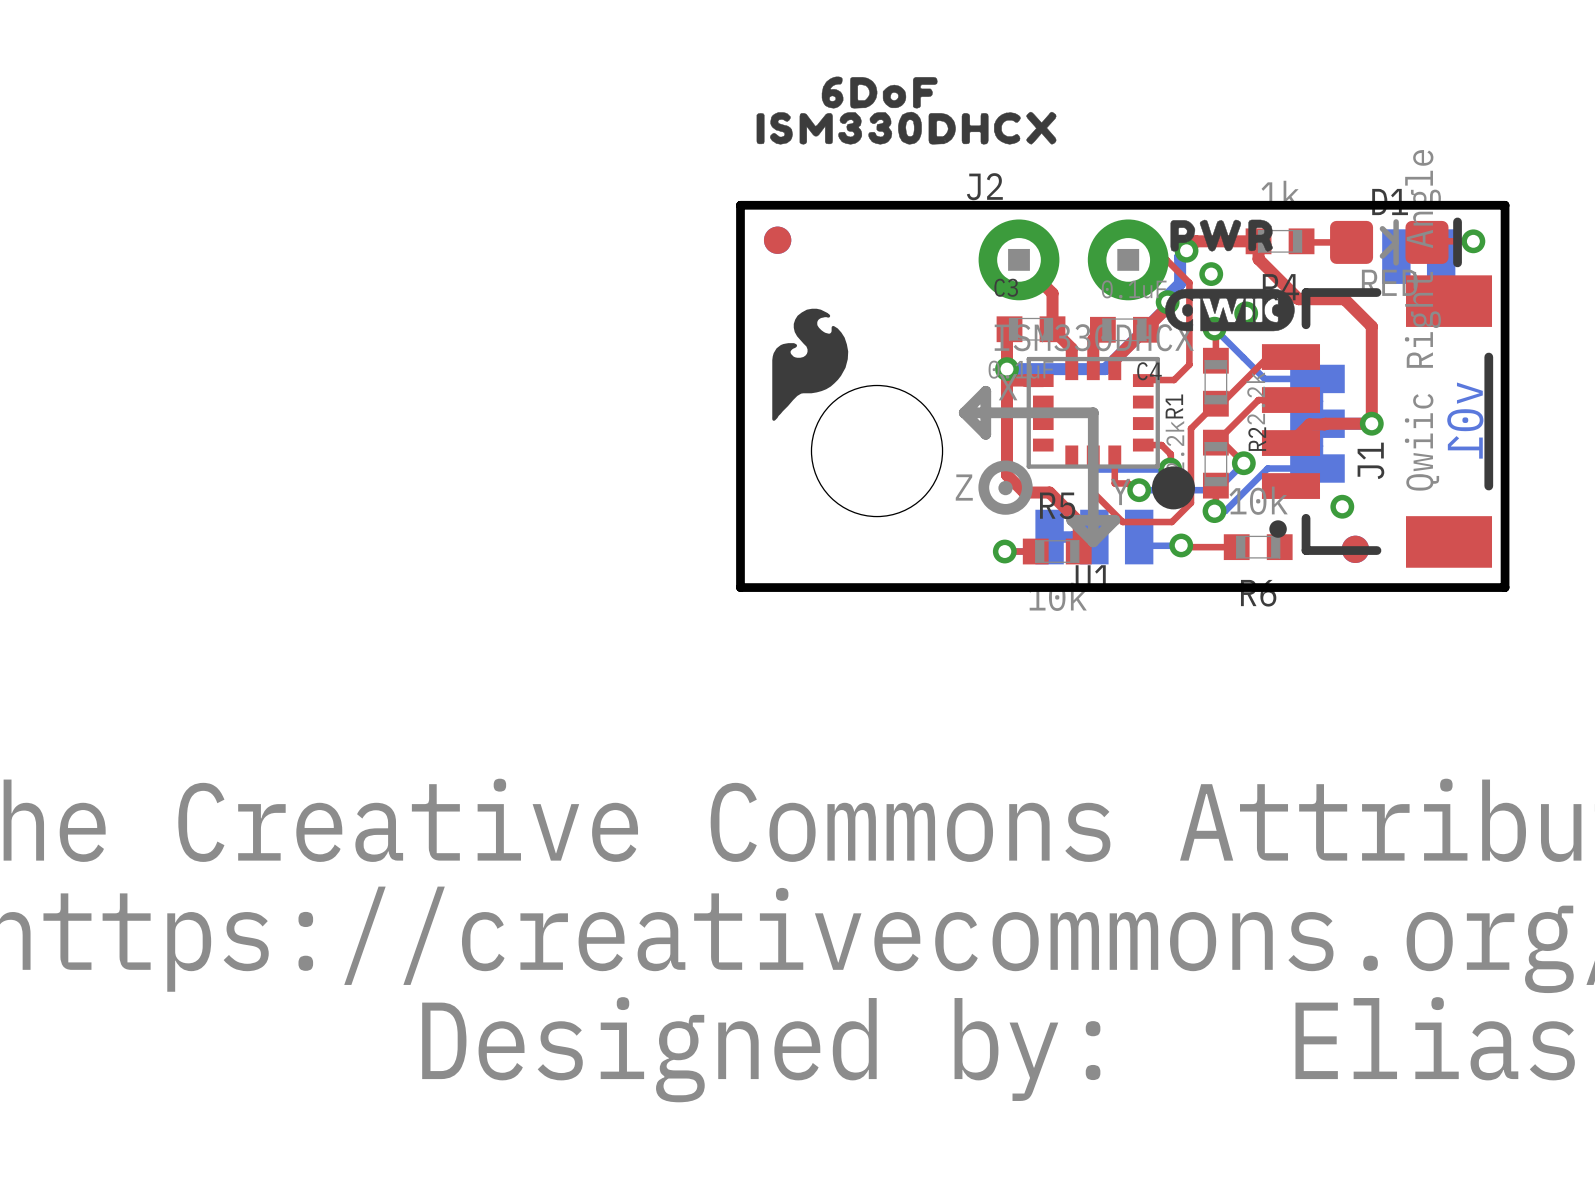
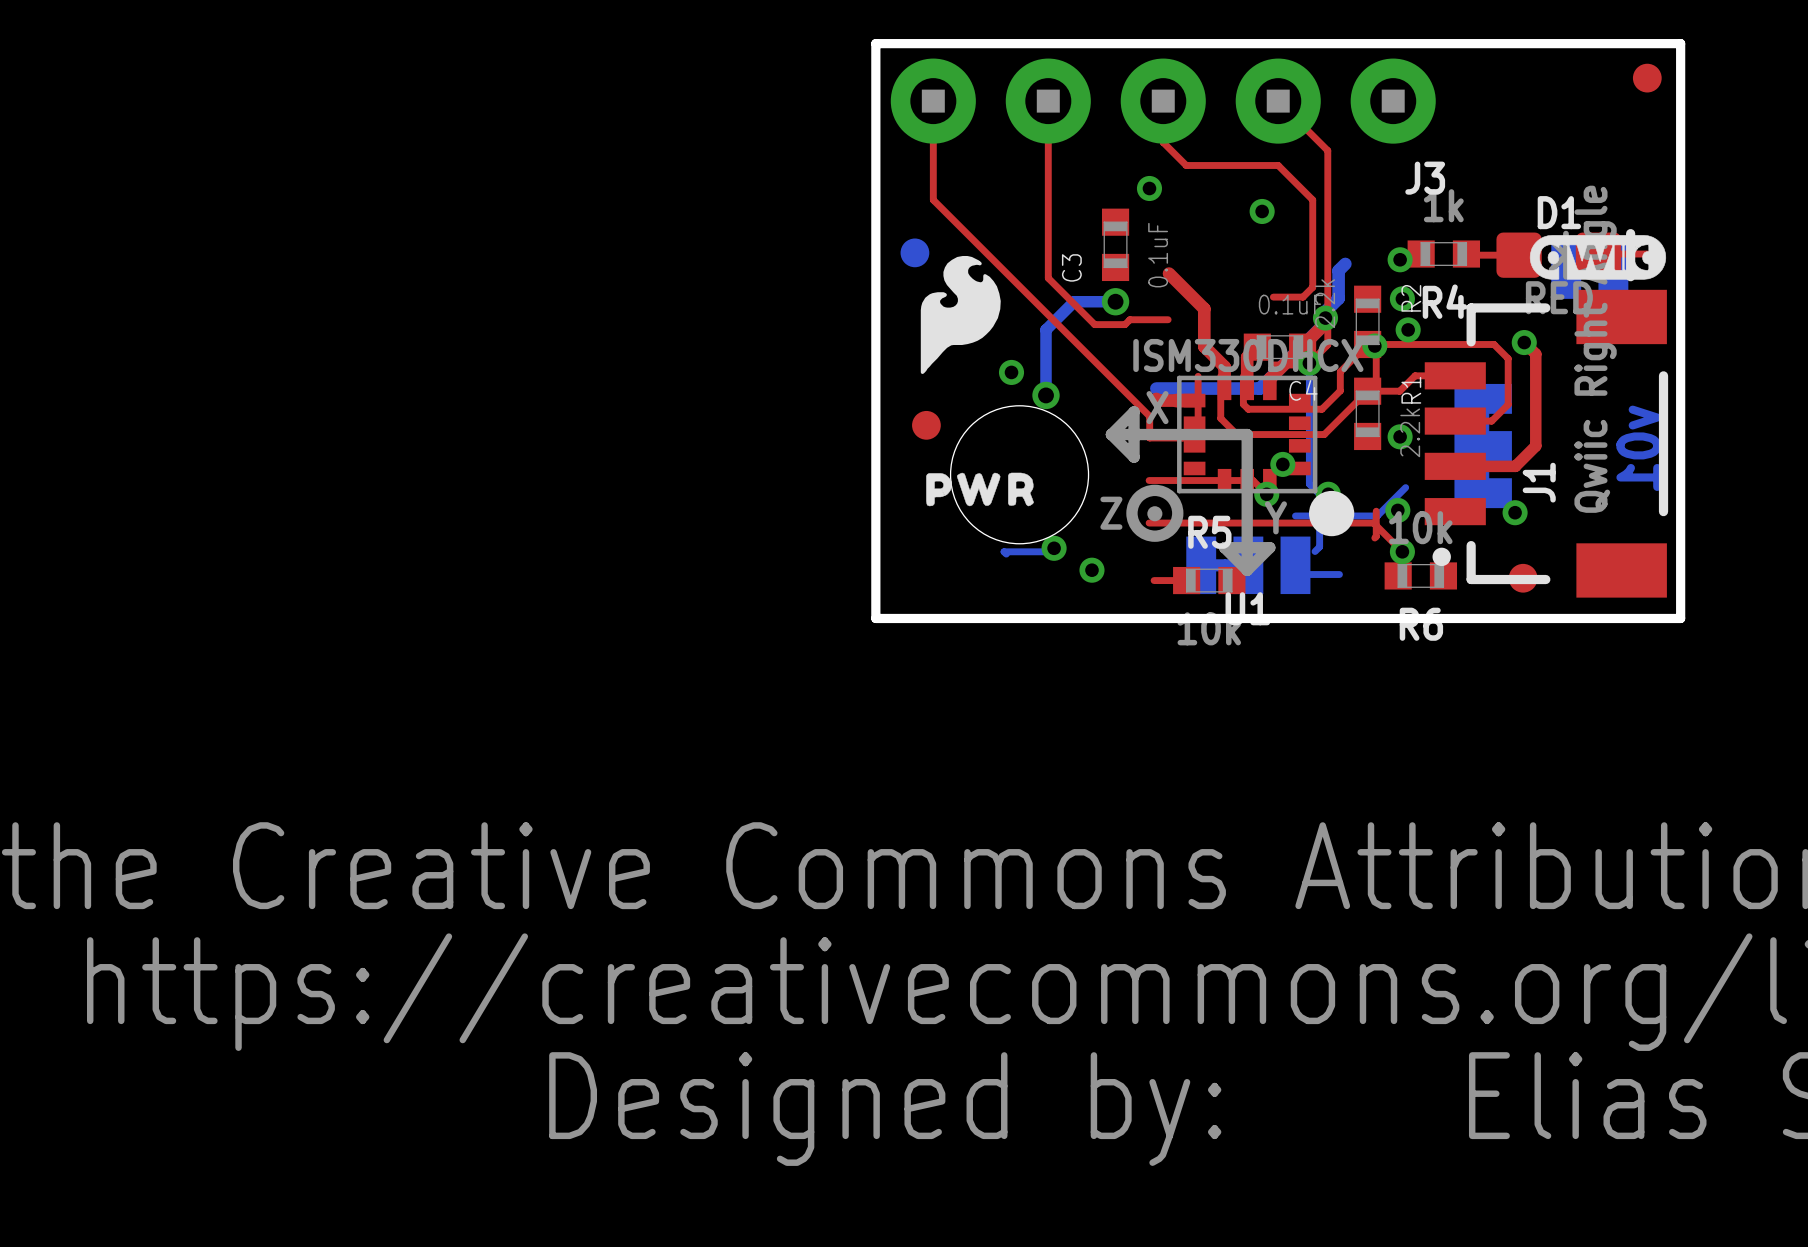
part: none -> (1647, 78)
drawing: [756, 76, 1057, 145] -> none
top track: none -> (933, 101) (933, 199) (1149, 416) (1149, 437) (1182, 437) (1198, 422) (1198, 376)
top track: none -> (1048, 101) (1048, 278) (1094, 324) (1125, 324) (1129, 319) (1168, 319)
top track: none -> (1163, 101) (1163, 142) (1186, 165) (1278, 165) (1312, 199) (1312, 287) (1302, 297) (1273, 297)
J3: none -> (1163, 101)
top track: none -> (1278, 101) (1327, 150) (1327, 344) (1307, 365) (1273, 365)
via: none -> (1149, 188)
via: none -> (1262, 211)
board edge: (740, 205) (1505, 205) -> (875, 216) (875, 43) (1680, 43) (1680, 216)
drawing position: (1221, 235) -> (980, 489)
part position: (777, 240) -> (926, 425)
via: (1473, 241) -> none
via: none -> (1400, 259)
via: (1186, 250) -> none
top track: (1182, 254) (1195, 241) (1258, 241) (1258, 259) (1298, 299) (1344, 299) (1371, 326) (1371, 423) (1309, 424) (1290, 443) -> (1524, 342) (1535, 354) (1535, 446) (1515, 466) (1455, 466)
J2: (1073, 259) -> none
top track: (1128, 259) (1166, 259) (1189, 282) (1189, 364) (1174, 380) (1143, 380) -> none
via: (1211, 274) -> none
via: none -> (1402, 298)
bottom track: none -> (1115, 301) (1074, 301) (1046, 329) (1046, 395)
via: none -> (1115, 301)
drawing position: (1229, 310) -> (1597, 257)
via: none -> (1524, 342)
bottom track: (1214, 328) (1264, 378) (1317, 378) -> none
top track: (1009, 329) (1006, 331) (1006, 475) (1024, 492) (1049, 492) (1078, 521) (1078, 551) -> none
C3 rotation: 0° (1031, 329) -> 90° clockwise (1115, 244)
C3 position: (1031, 329) -> (1115, 244)
bottom track: none -> (1309, 363) (1309, 484) (1319, 494) (1319, 546) (1315, 551)
via: none -> (1309, 363)
via: none -> (1011, 372)
top track: (1268, 357) (1221, 403) (1215, 403) (1190, 428) (1190, 502) (1171, 522) (1122, 522) (1093, 492) (1093, 455) -> (1431, 375) (1415, 375) (1399, 391) (1367, 391) (1324, 434) (1236, 434) (1220, 418) (1220, 376)
drawing position: (810, 364) -> (960, 314)
via: (1006, 369) -> none
via: none -> (1046, 395)
R1 position: (1215, 382) -> (1367, 413)
top track: (1290, 400) (1258, 400) (1215, 442) (1223, 442) (1243, 463) -> (1455, 421) (1491, 421) (1508, 404) (1508, 358) (1494, 344) (1367, 344) (1340, 371) (1340, 390) (1321, 409) (1248, 409) (1243, 404) (1243, 376)
R1 name position: R1 (1174, 406) -> R1 (1411, 390)
via: none -> (1400, 436)
via: (1371, 423) -> none
via: none -> (1282, 464)
top track: (1143, 445) (1161, 445) (1170, 454) (1170, 469) -> none
top track: (1114, 455) (1114, 483) (1128, 483) (1134, 490) (1139, 490) -> none
top track: none -> (1149, 480) (1252, 480) (1266, 494)
via position: (1243, 463) -> (1397, 510)
R2 position: (1215, 464) -> (1367, 321)
bottom track: (1317, 468) (1267, 468) (1225, 511) (1214, 511) -> none
bottom track: (1094, 469) (1170, 469) -> none
via: none -> (1266, 494)
via: (1139, 490) -> none
top track: none -> (1149, 523) (1373, 523) (1402, 551)
via position: (1342, 506) -> (1515, 512)
via: (1214, 511) -> none
bottom track: none -> (1054, 548) (1050, 551) (1004, 551) (1006, 554)
via: none -> (1054, 548)
via: none -> (1402, 551)
via: none -> (1091, 570)
top track: (1181, 545) (1182, 547) (1236, 547) -> none
via: (1181, 545) -> none
via: (1004, 551) -> none

